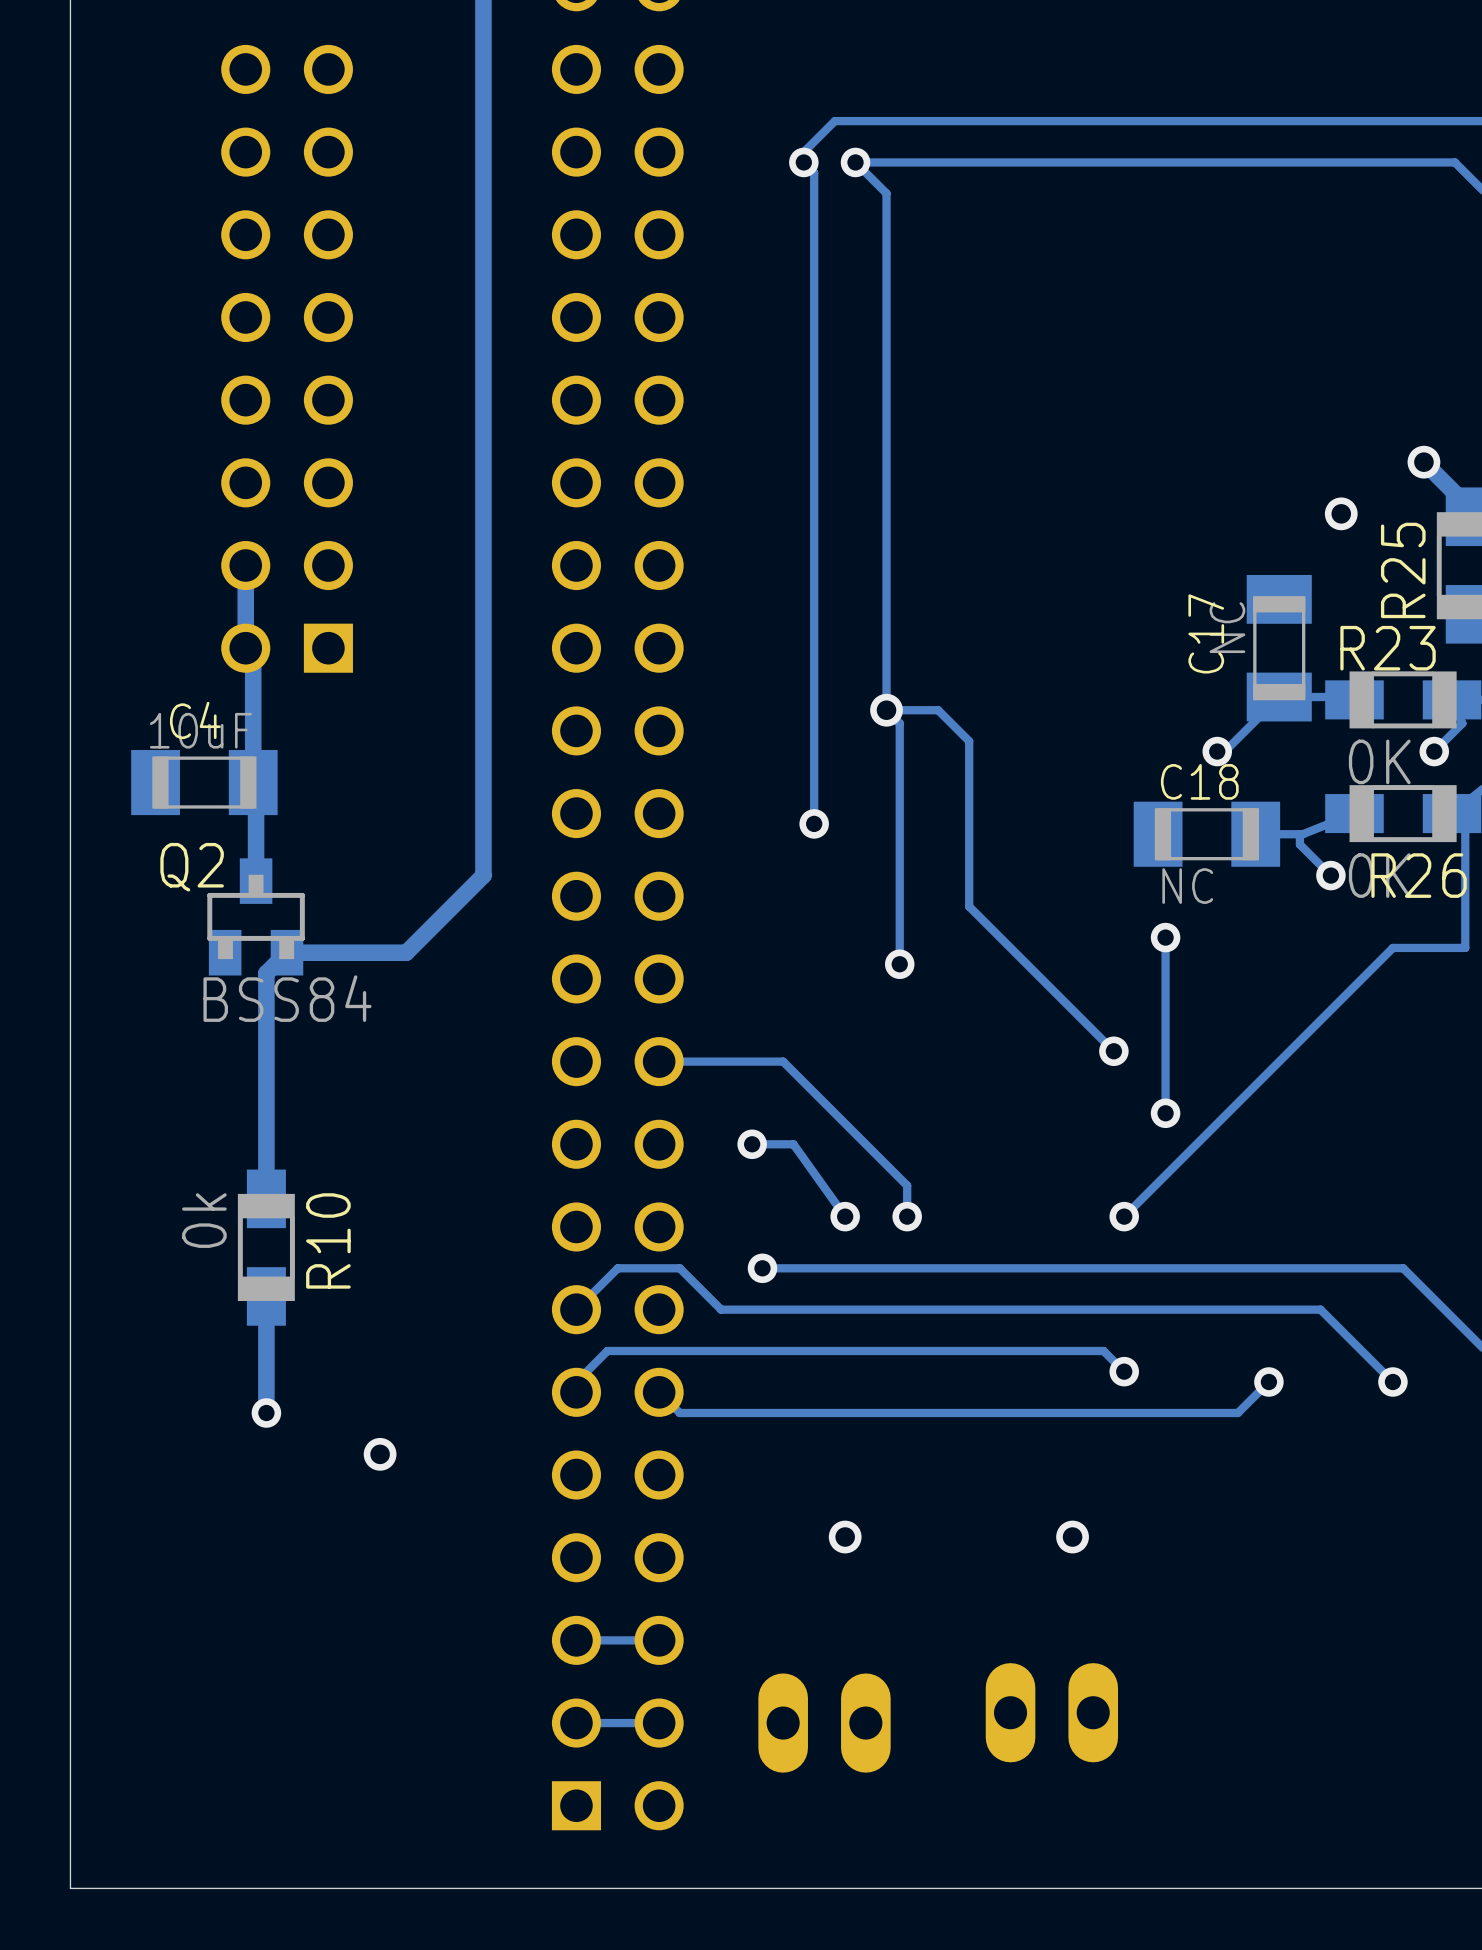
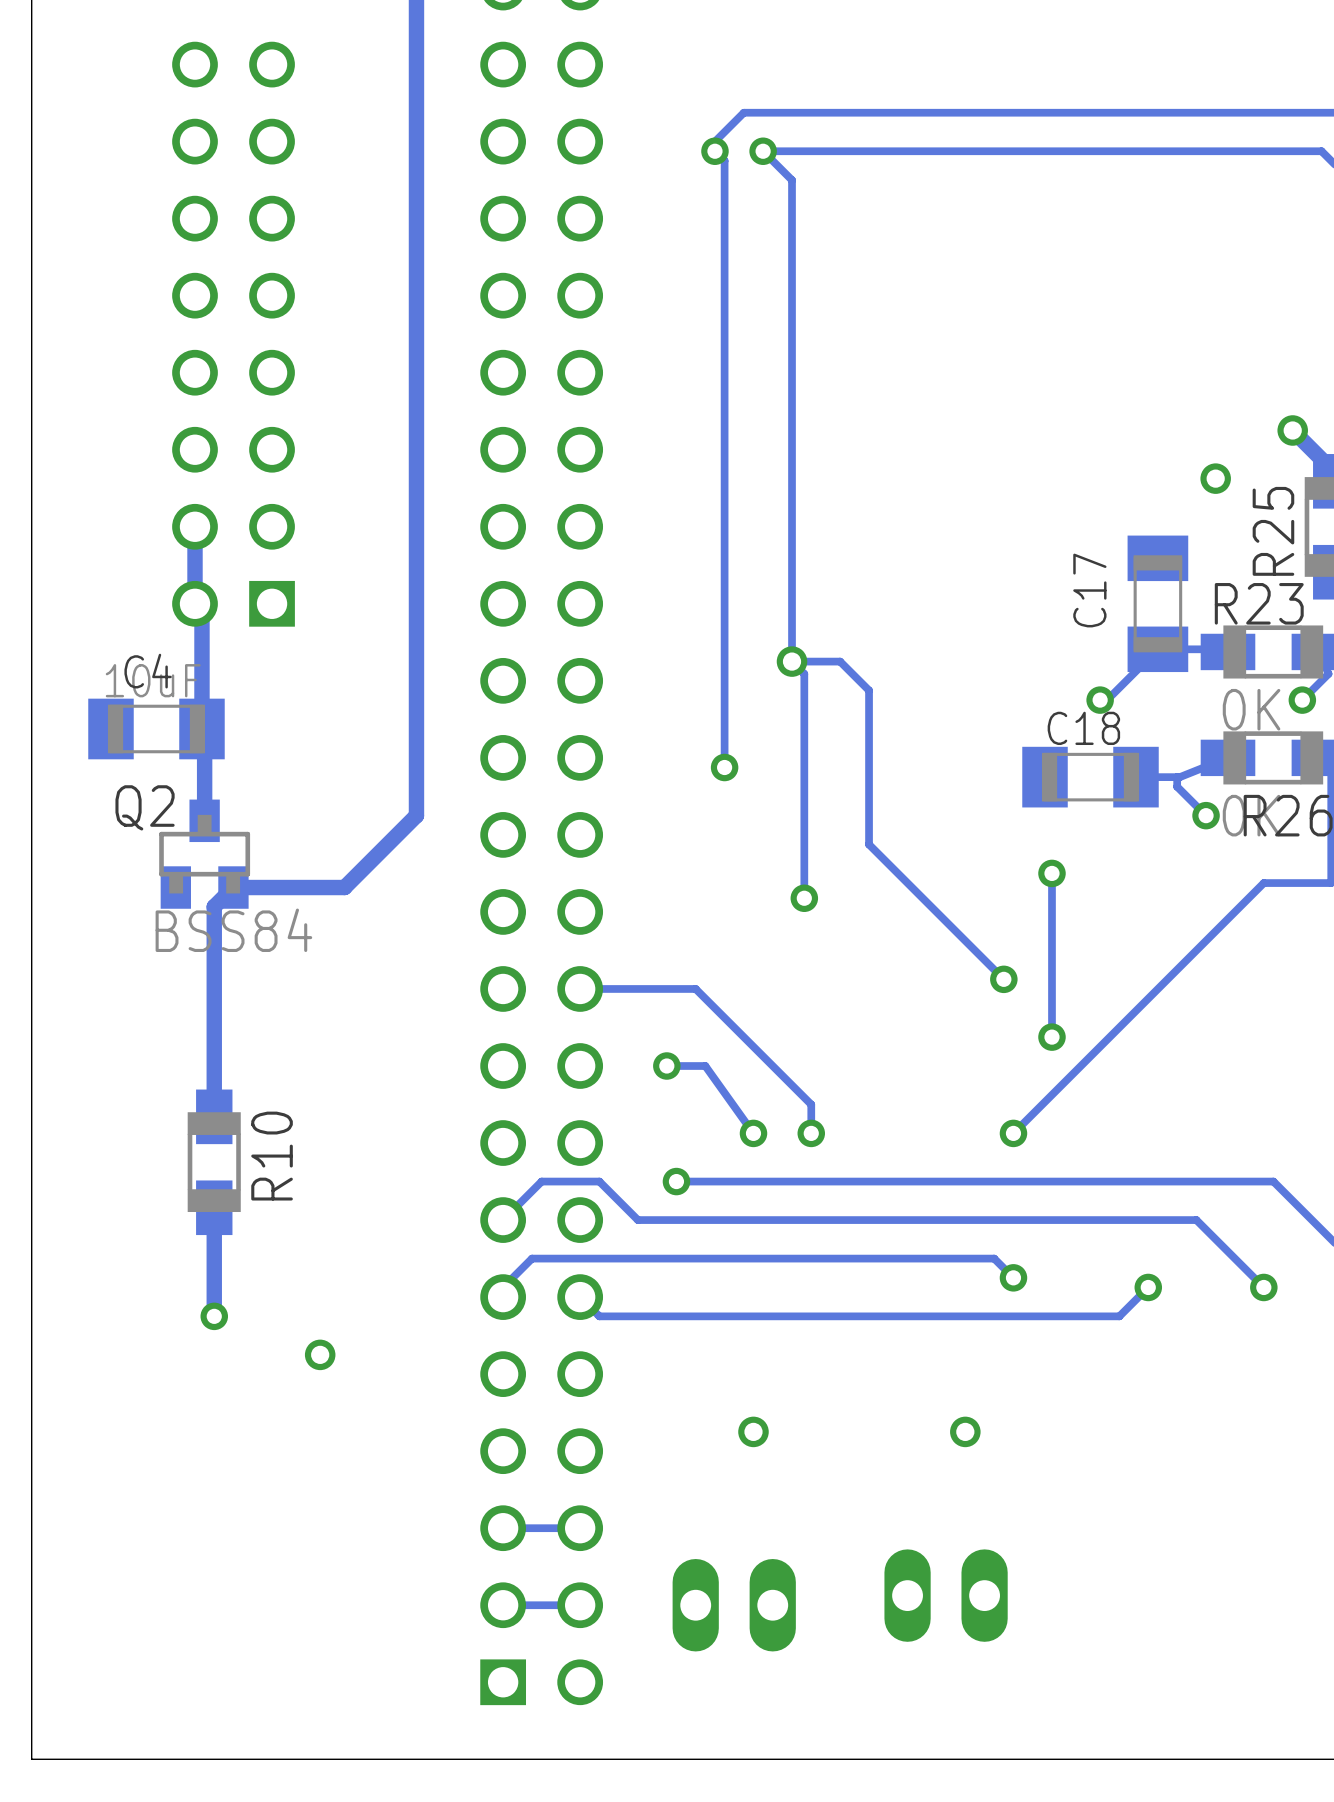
C17 value: NC (1227, 627) -> none
C18 value: NC (1187, 886) -> none
R10 value: 0k (204, 1220) -> none

